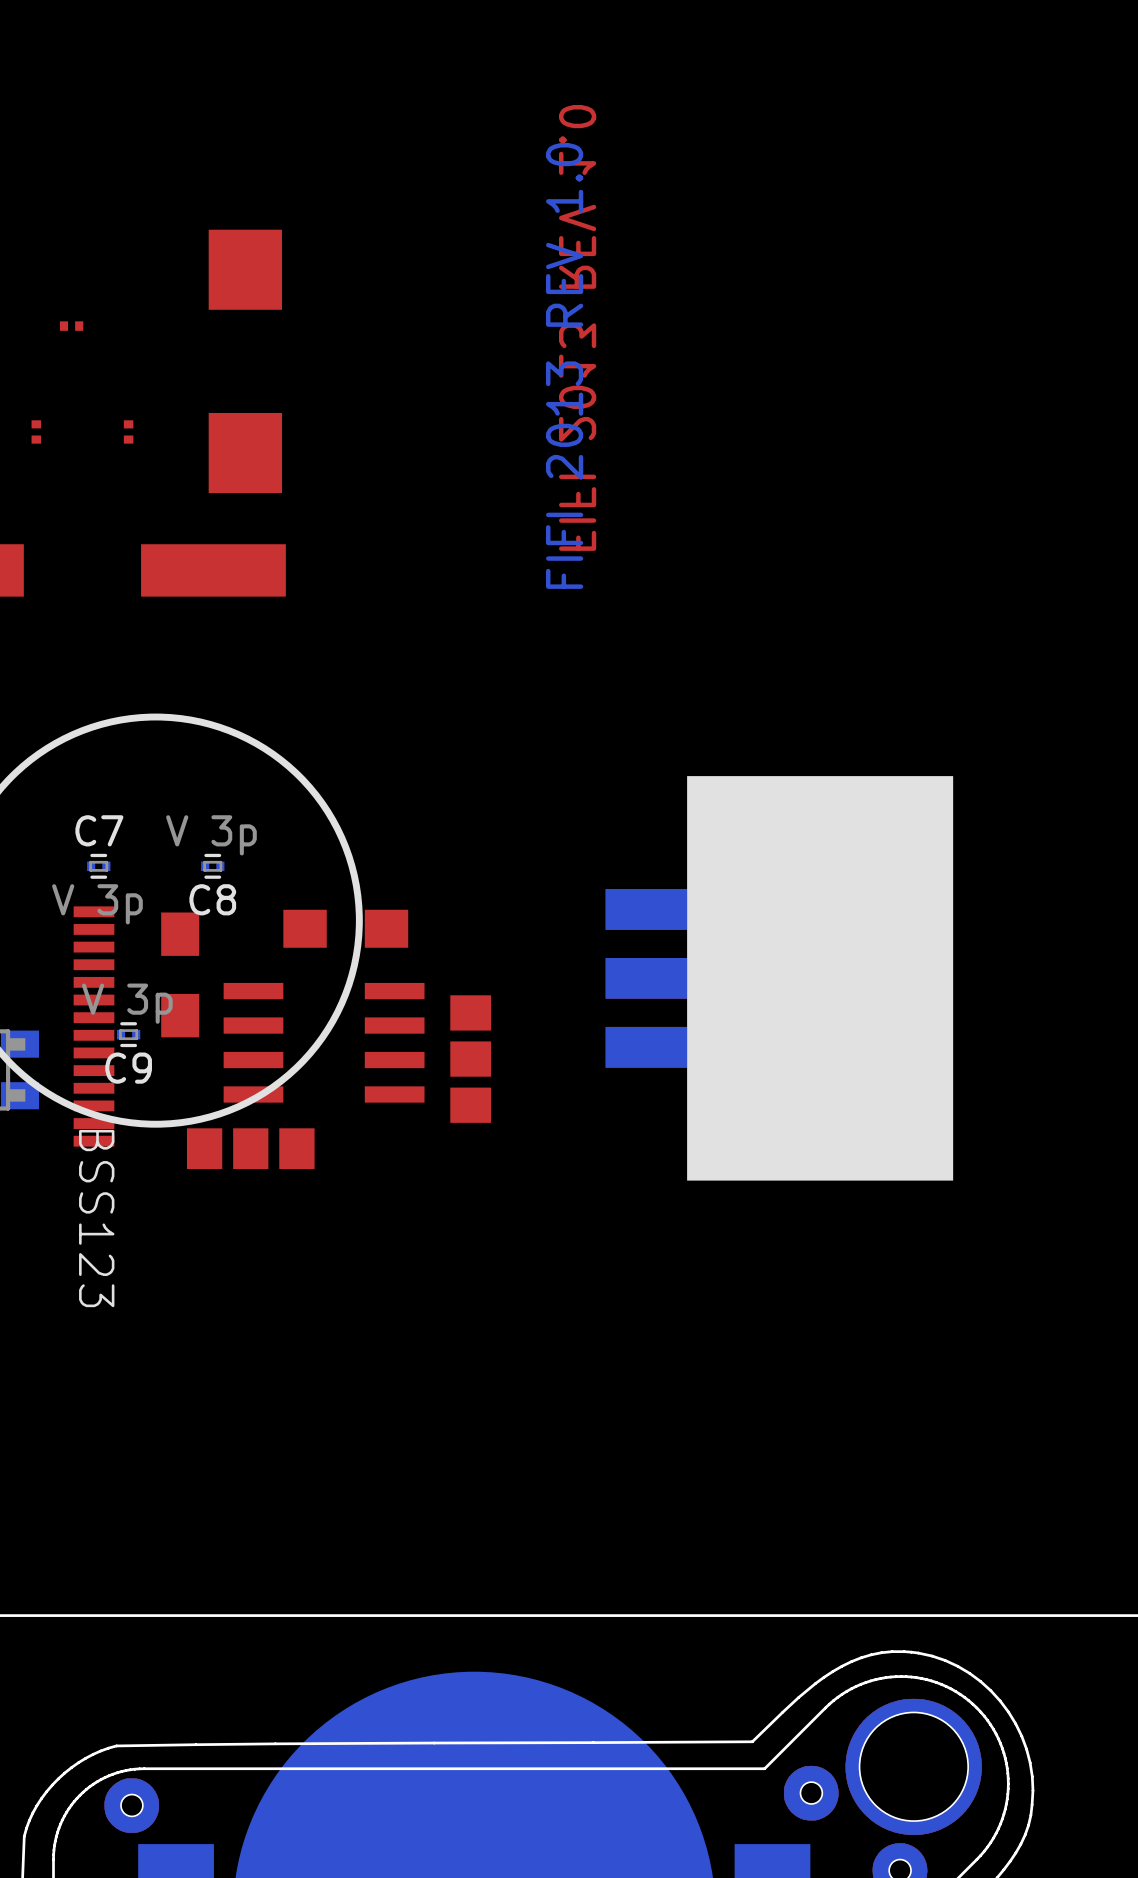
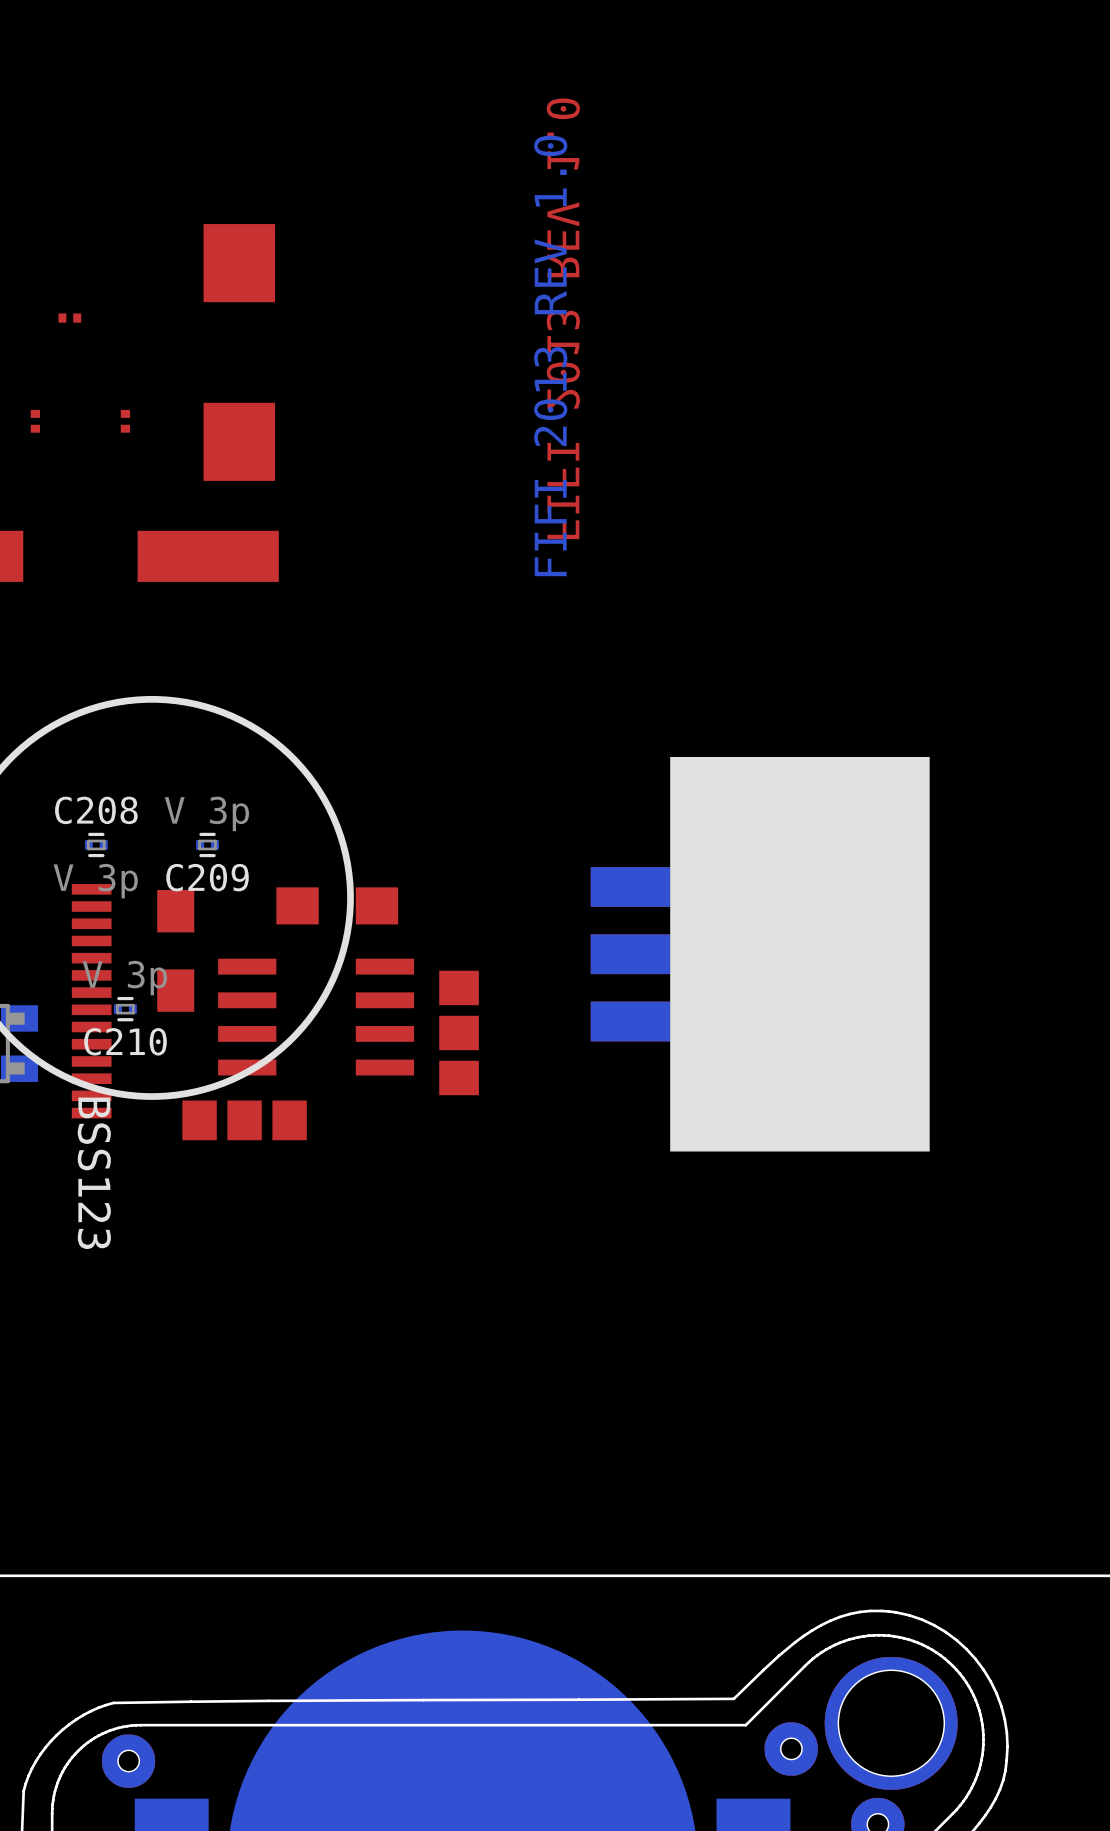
C7 name: C7 (99, 830) -> C208 (96, 810)
C8 name: C8 (212, 899) -> C209 (207, 877)
C9 name: C9 (128, 1068) -> C210 (125, 1041)

